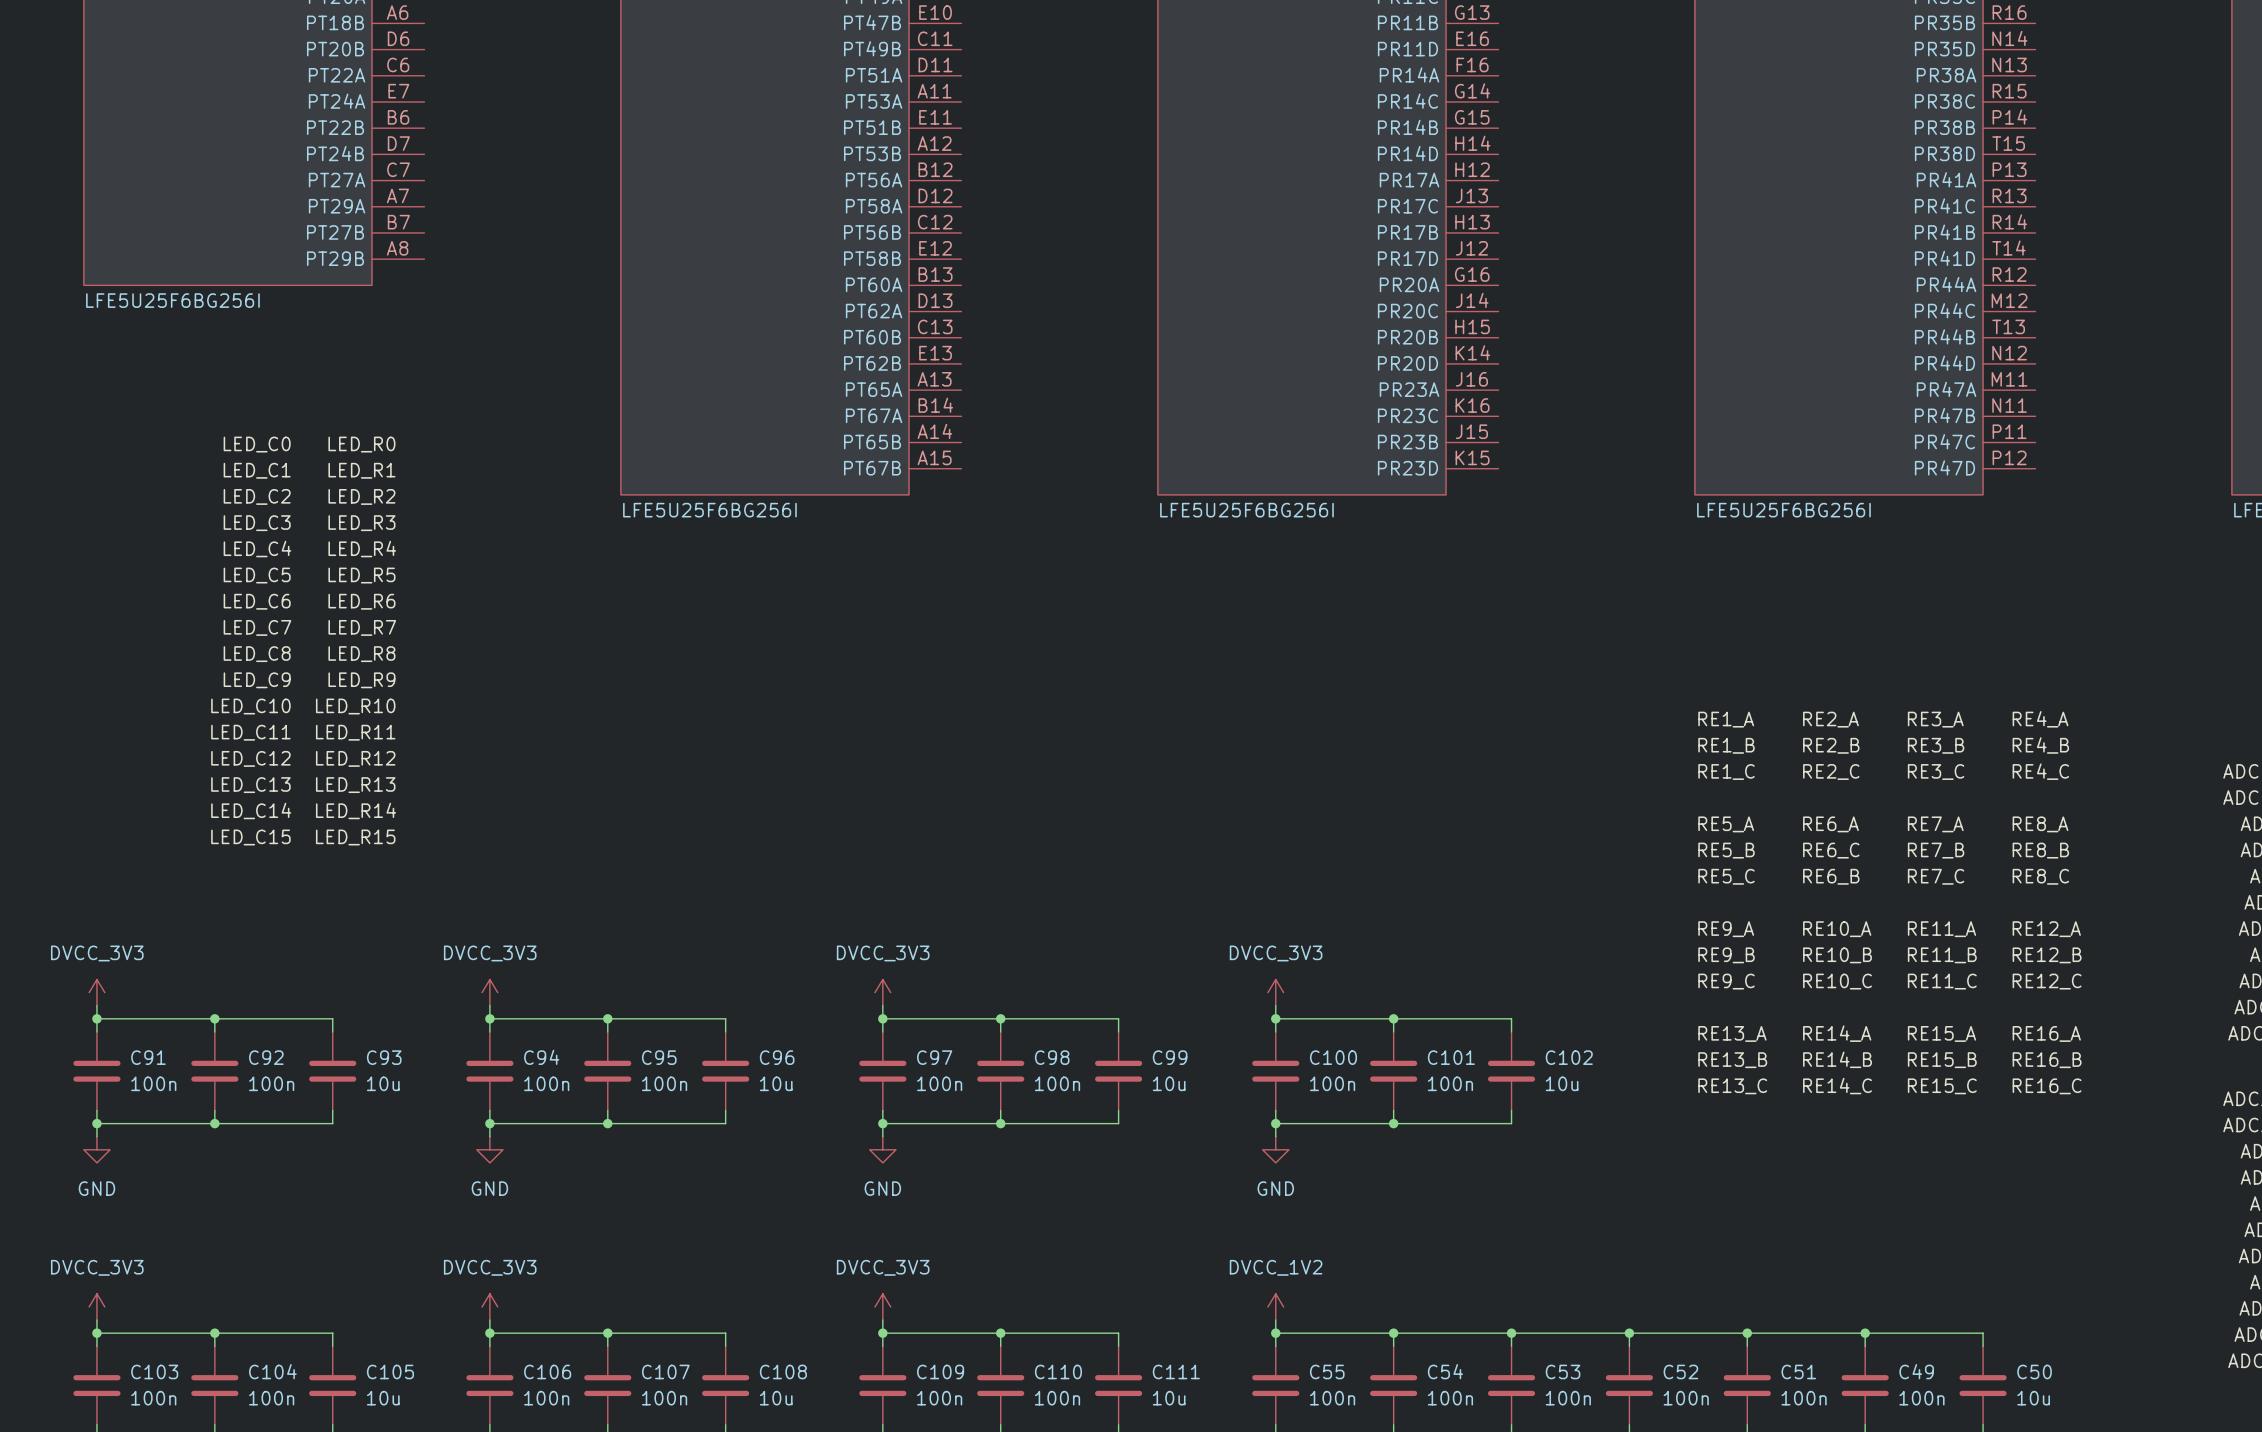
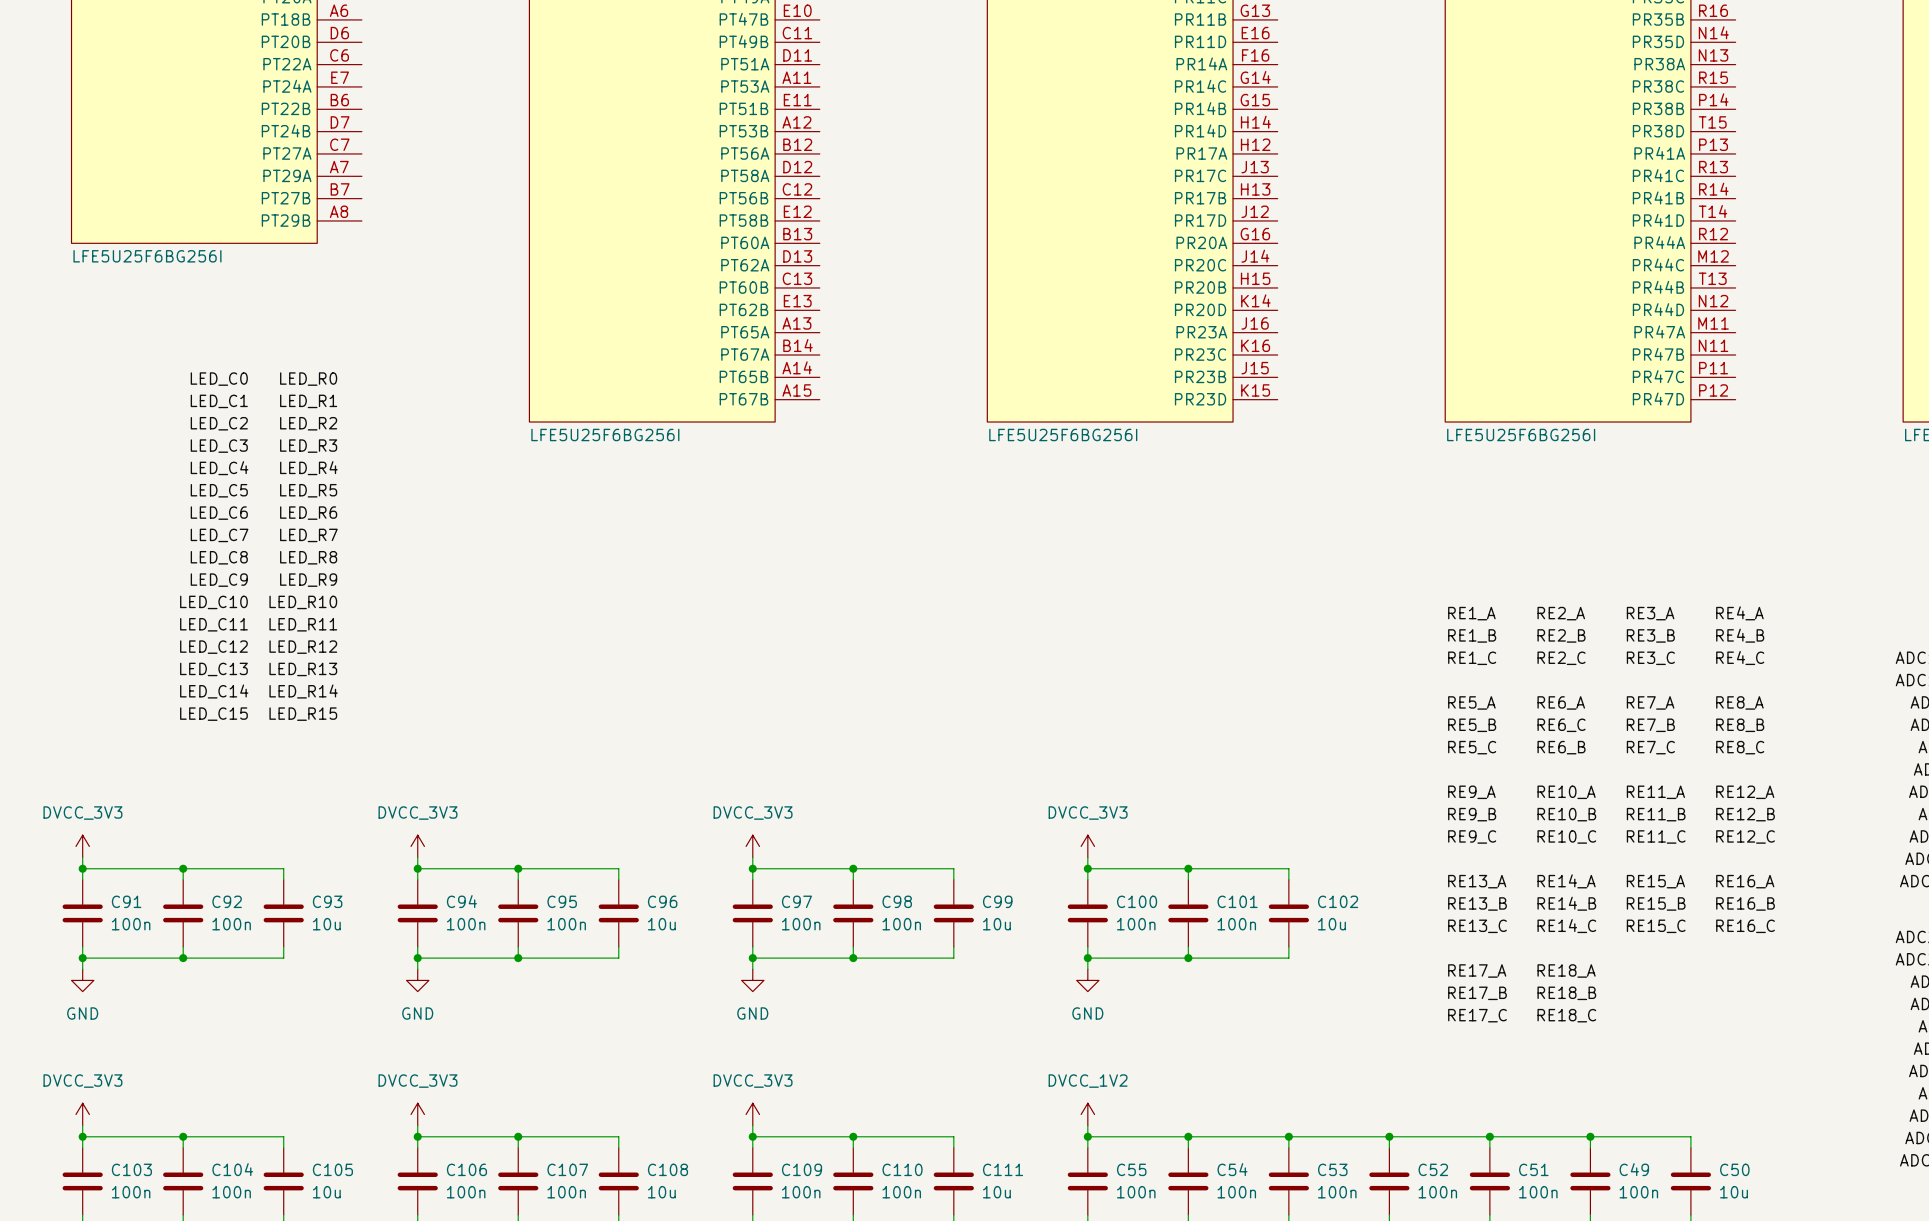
label: none -> RE17_A (1477, 970)
label: none -> RE18_A (1566, 970)
label: none -> RE17_B (1477, 993)
label: none -> RE18_B (1566, 993)
label: none -> RE17_C (1477, 1015)
label: none -> RE18_C (1566, 1015)

